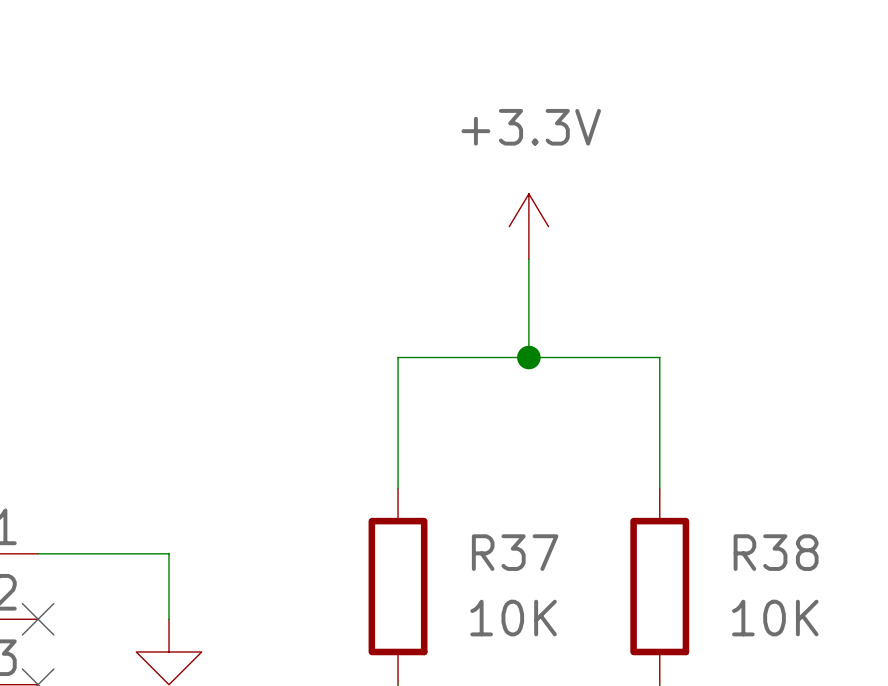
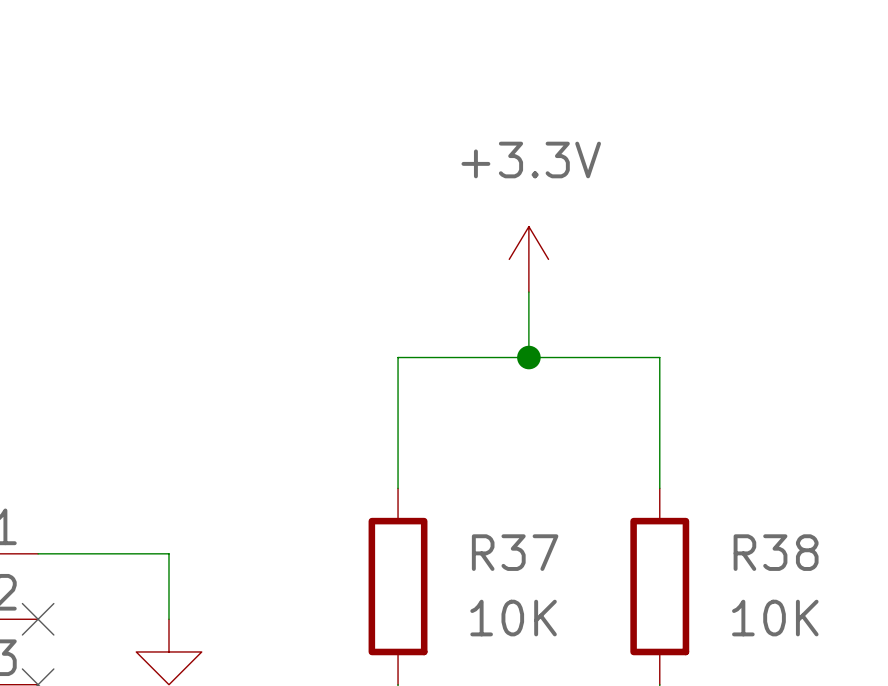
power symbol position: +3.3V (528, 226) -> +3.3V (528, 259)

